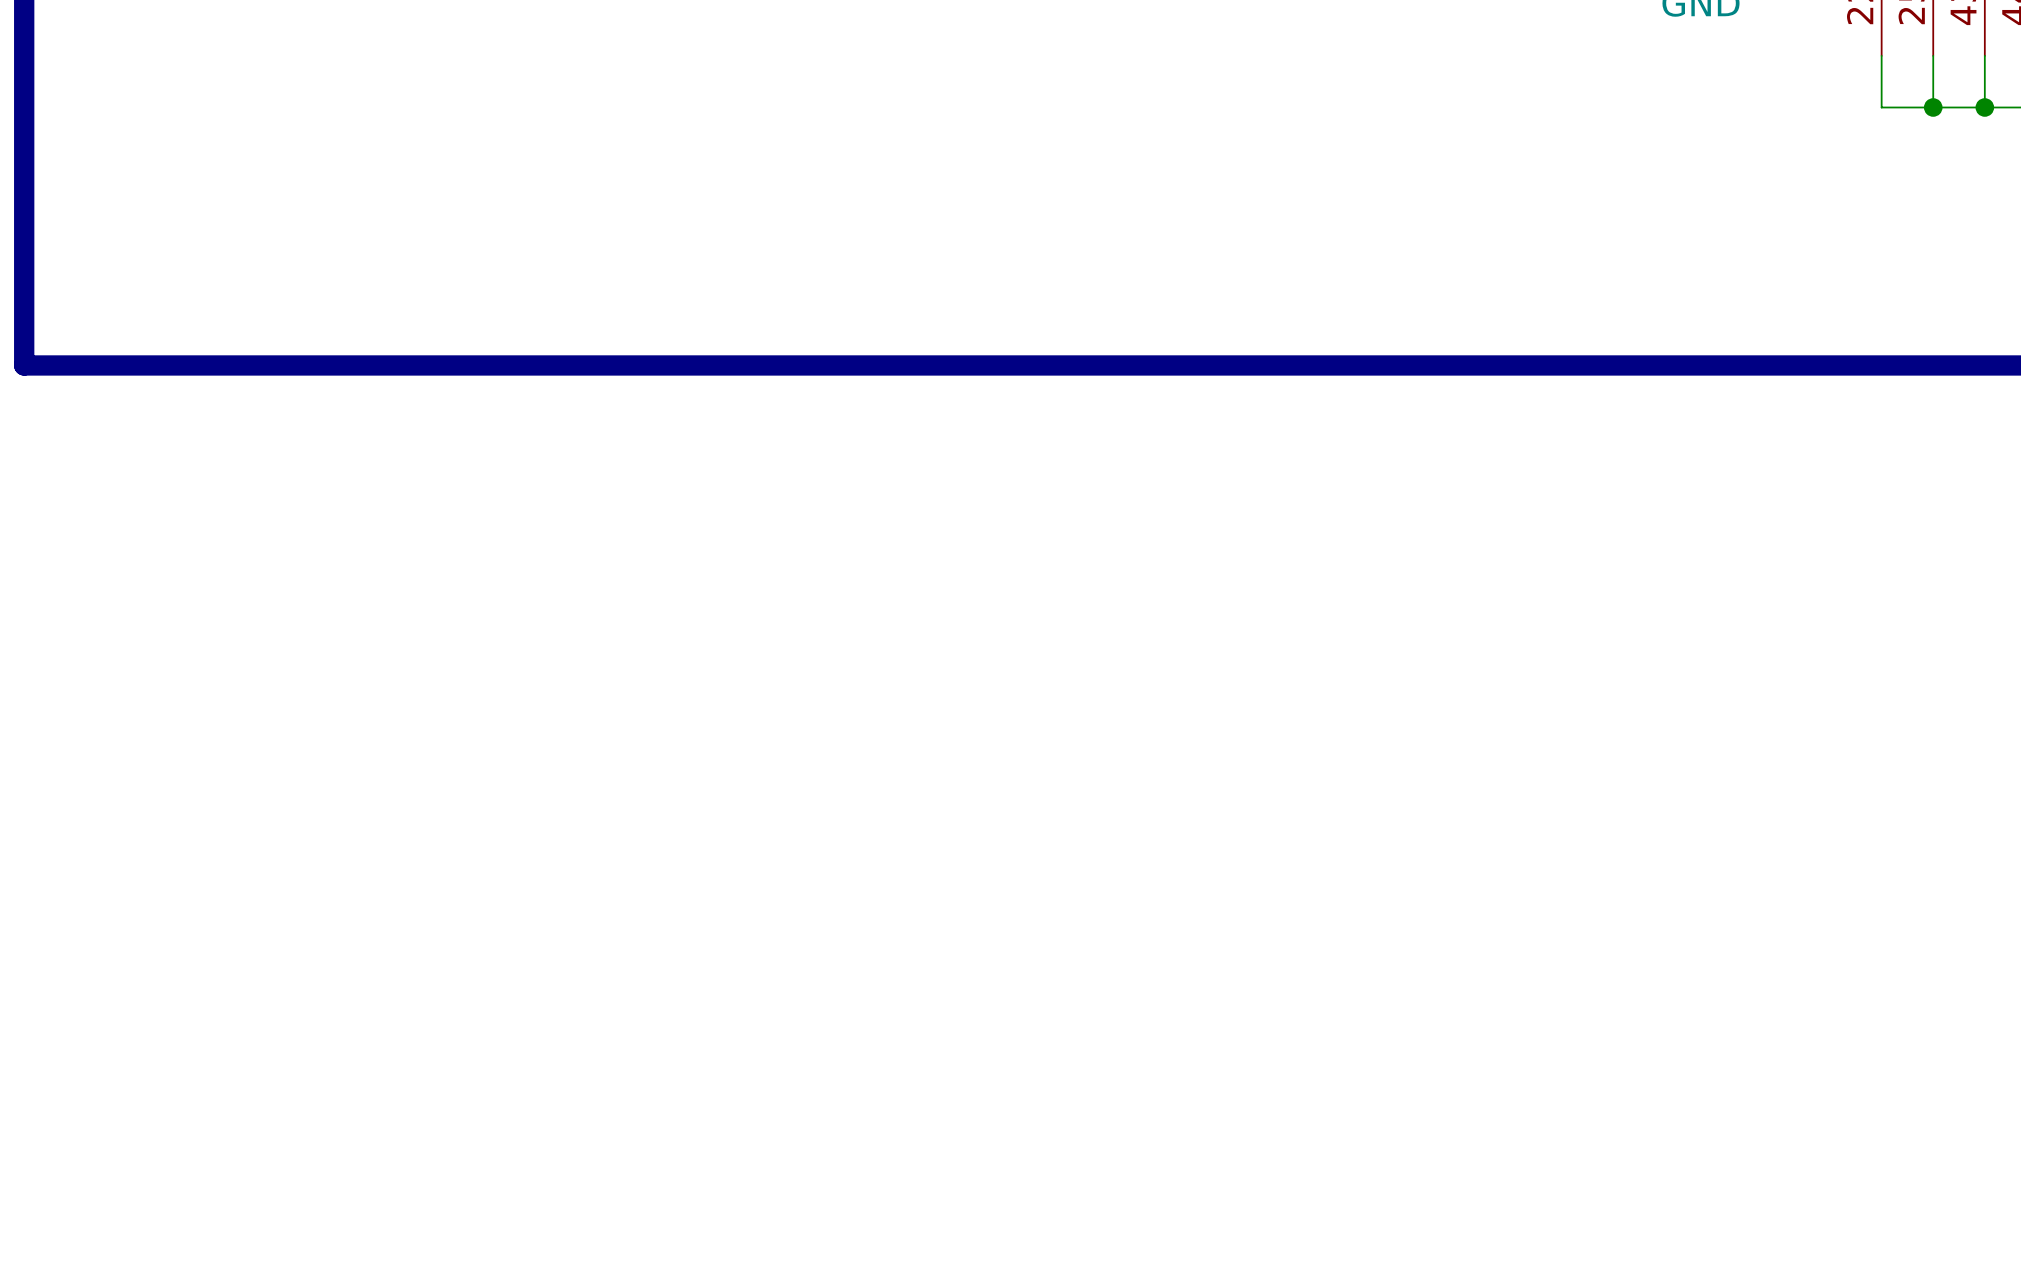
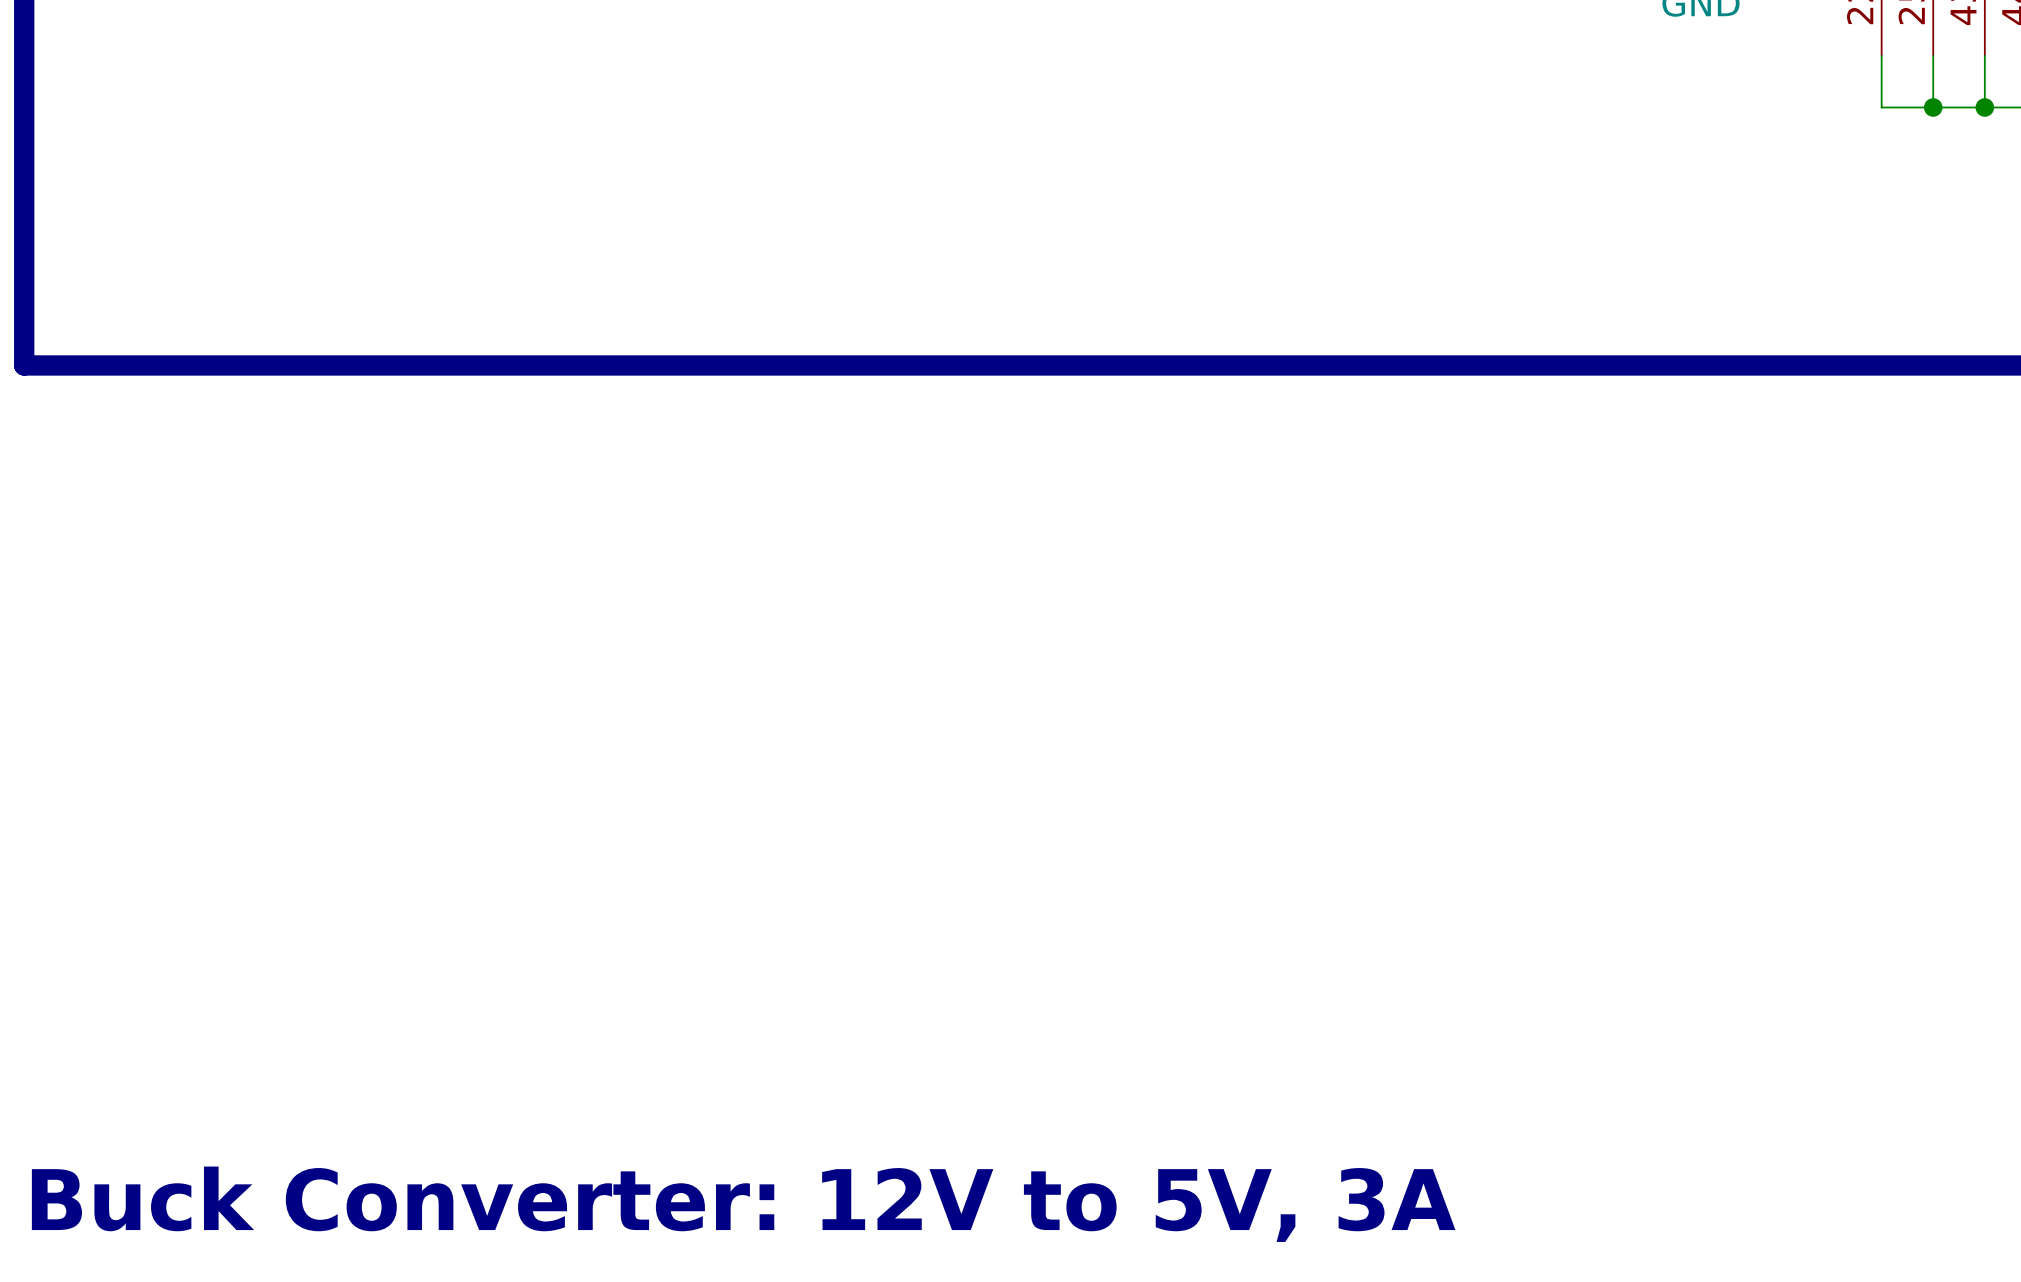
text: none -> Buck Converter: 12V to 5V, 3A (743, 1204)

